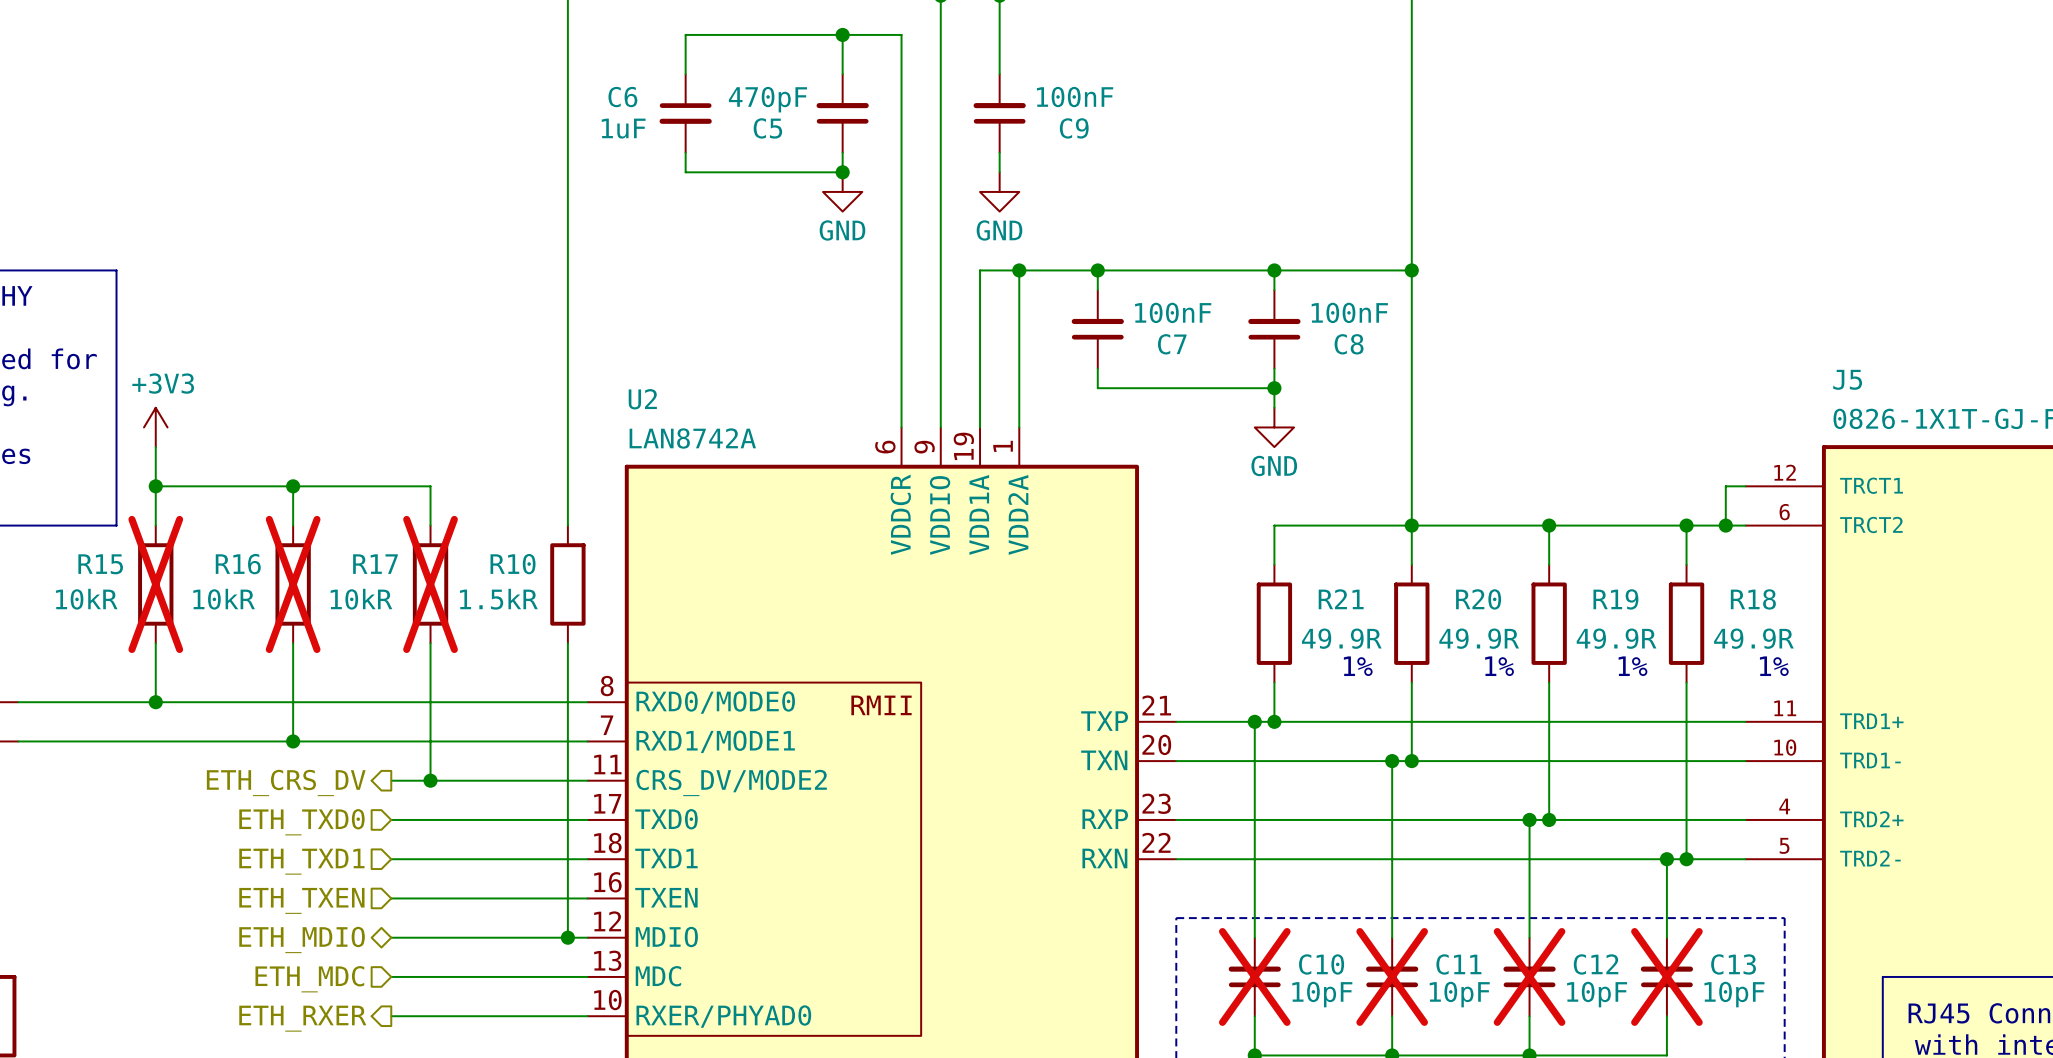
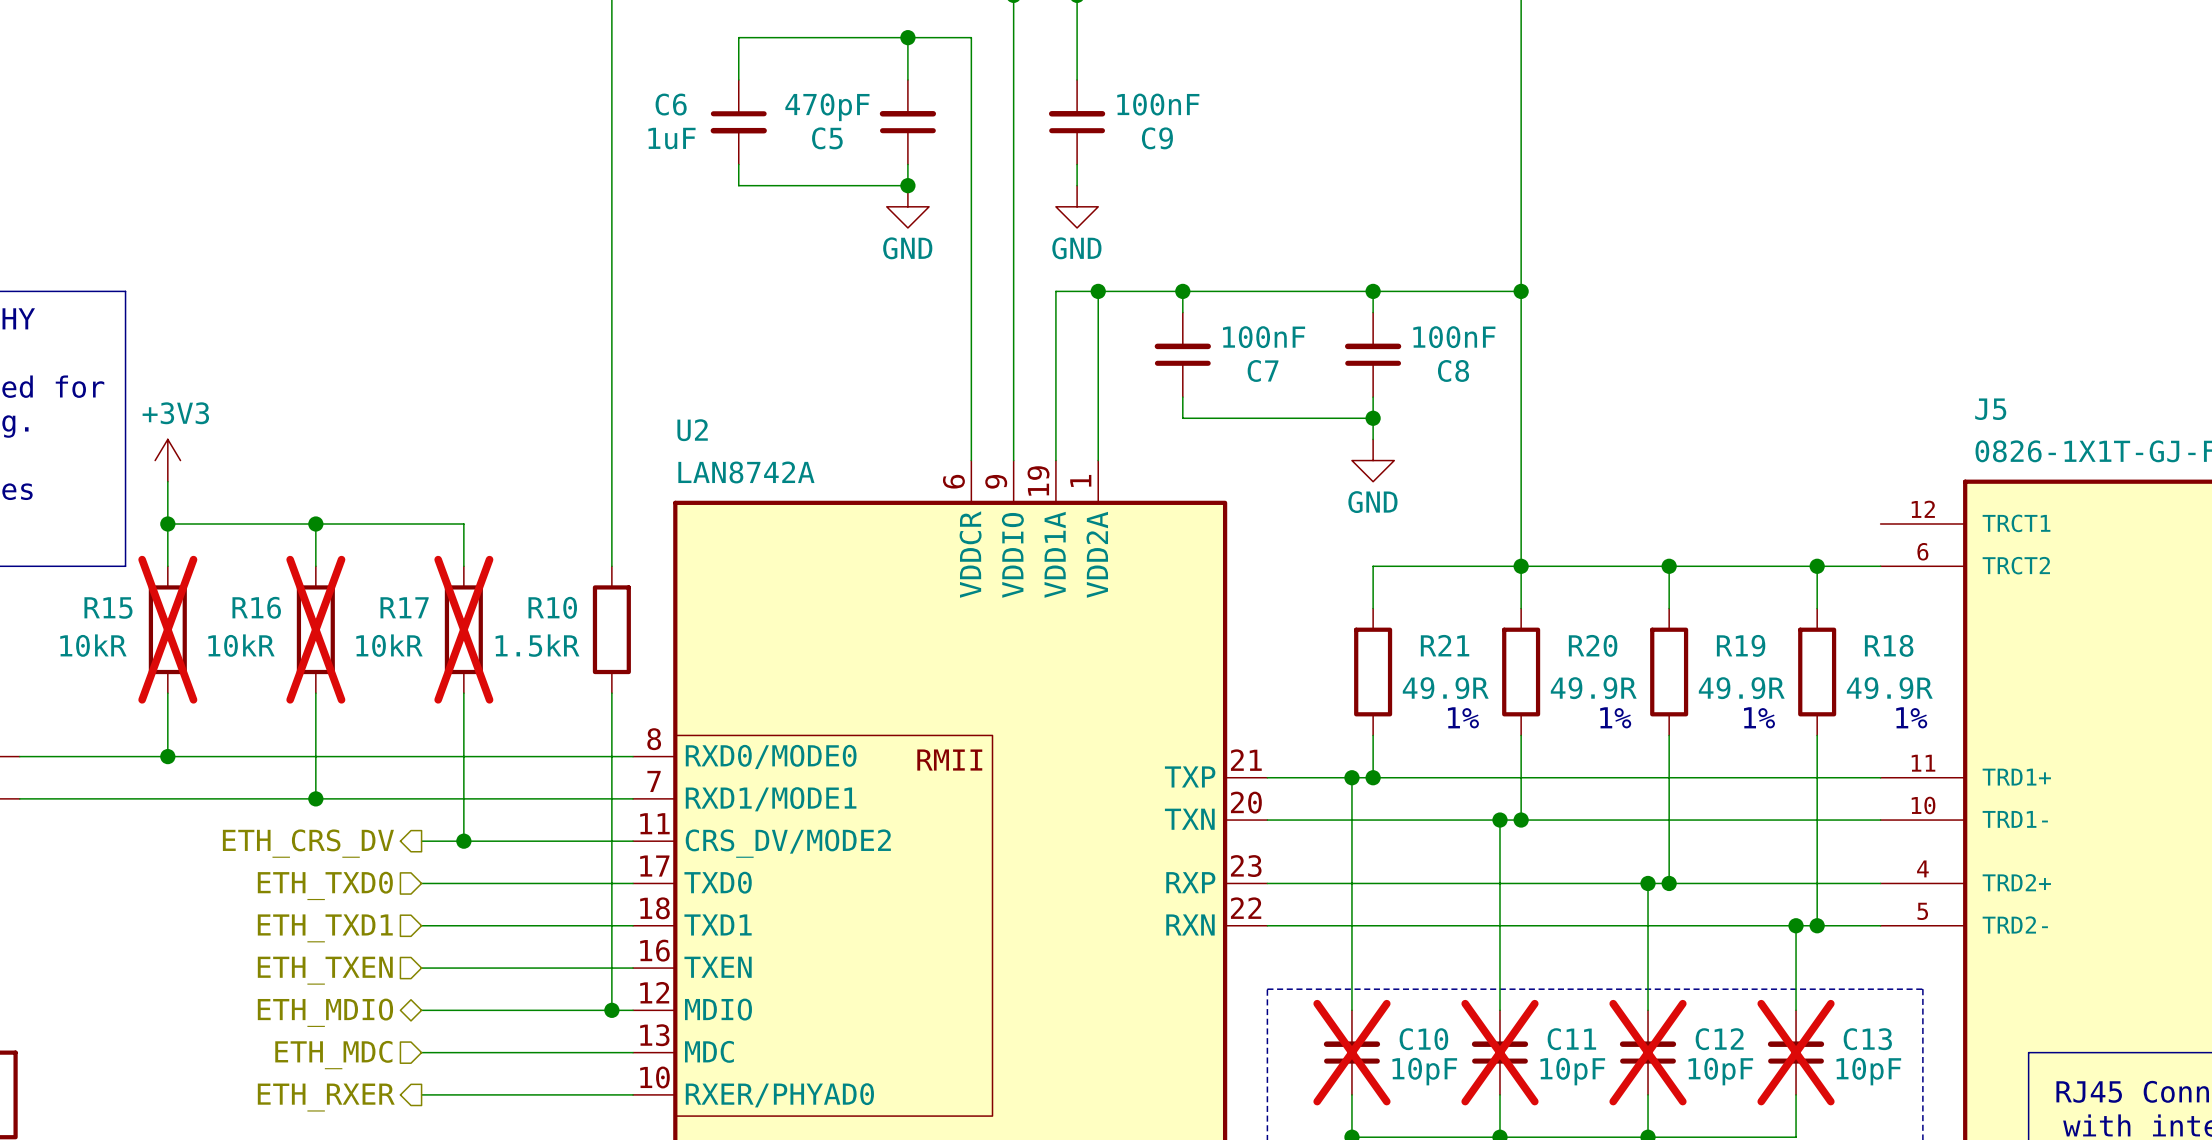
wire: (1745, 486) (1725, 486) (1725, 525) -> none
junction: (1725, 525) -> none

